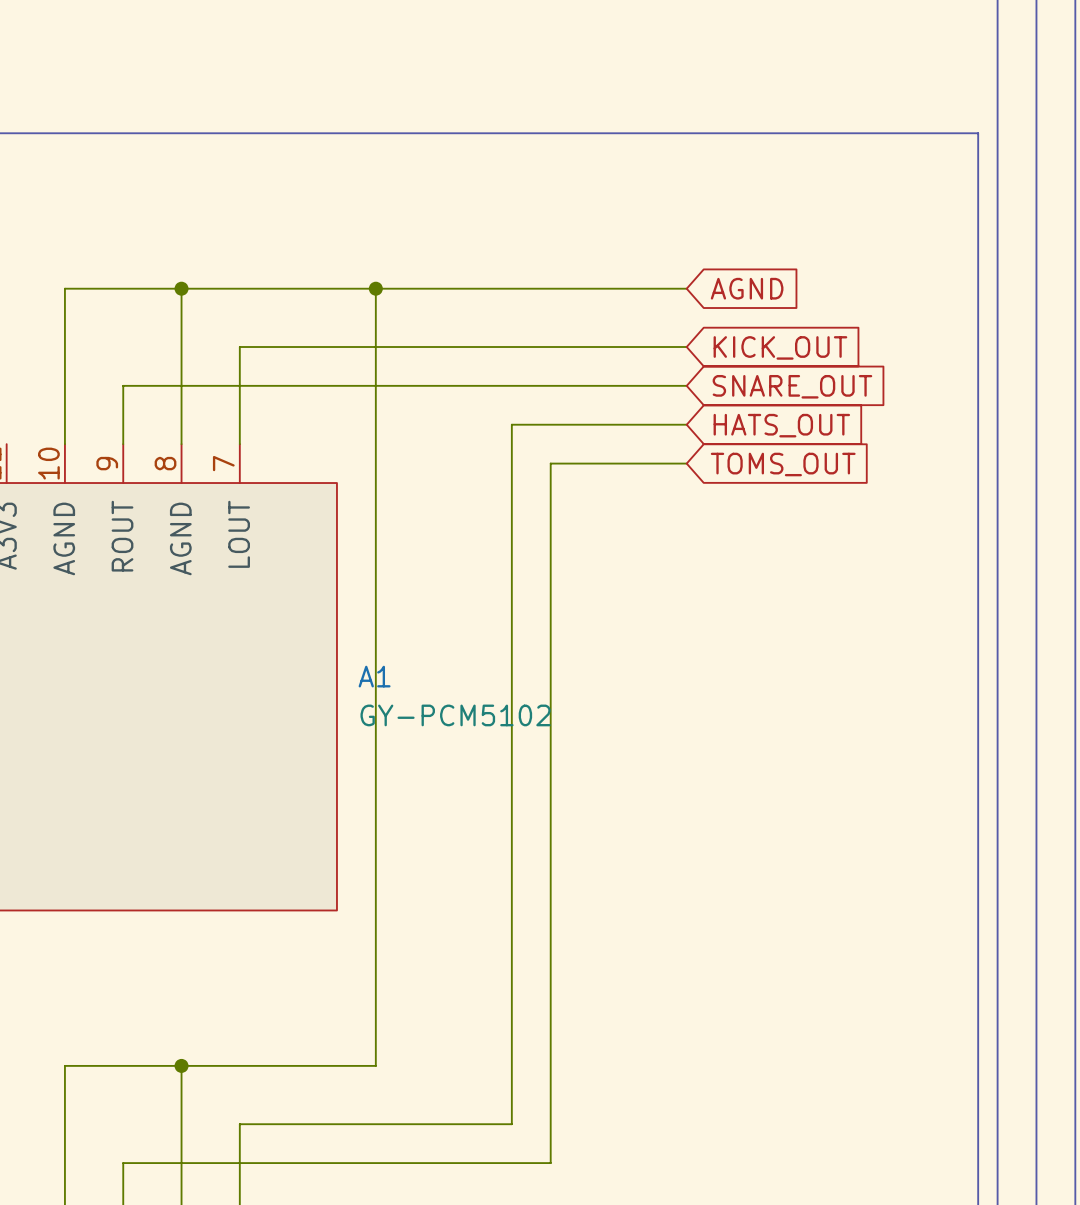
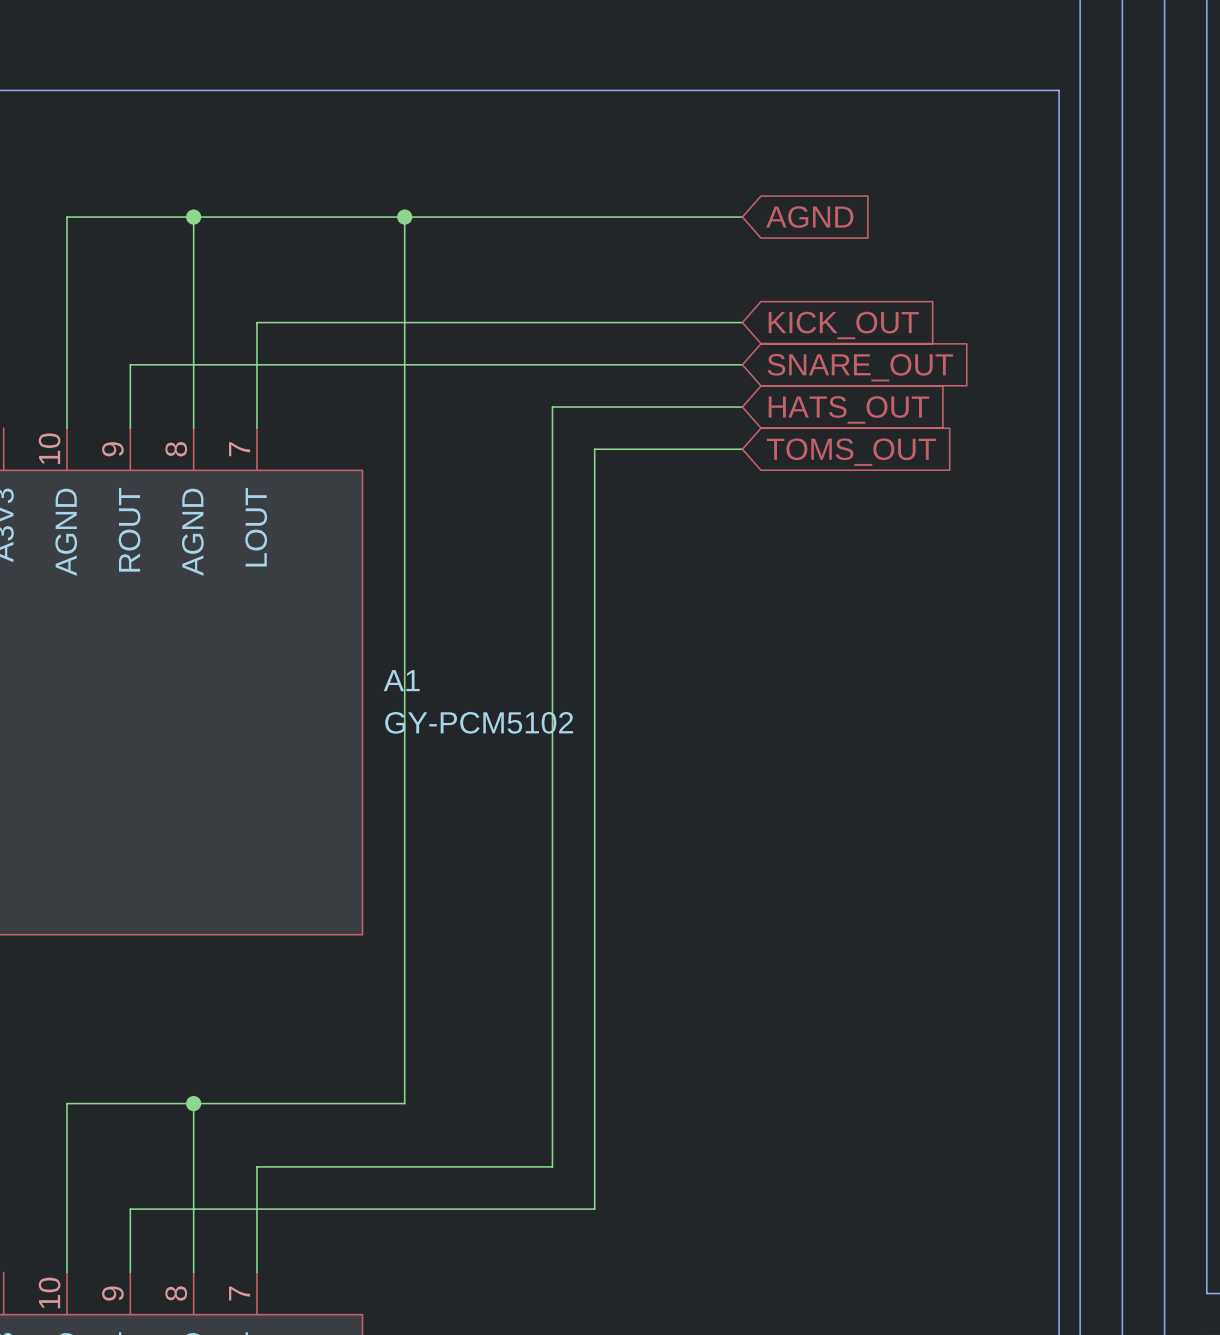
wire: none -> (193, 217) (193, 259)
wire: none -> (404, 217) (404, 259)
wire: (64, 288) (686, 288) -> (67, 259) (67, 217) (742, 217)
junction position: (181, 288) -> (193, 217)
junction position: (375, 288) -> (404, 217)
global label position: AGND (747, 288) -> AGND (809, 217)

